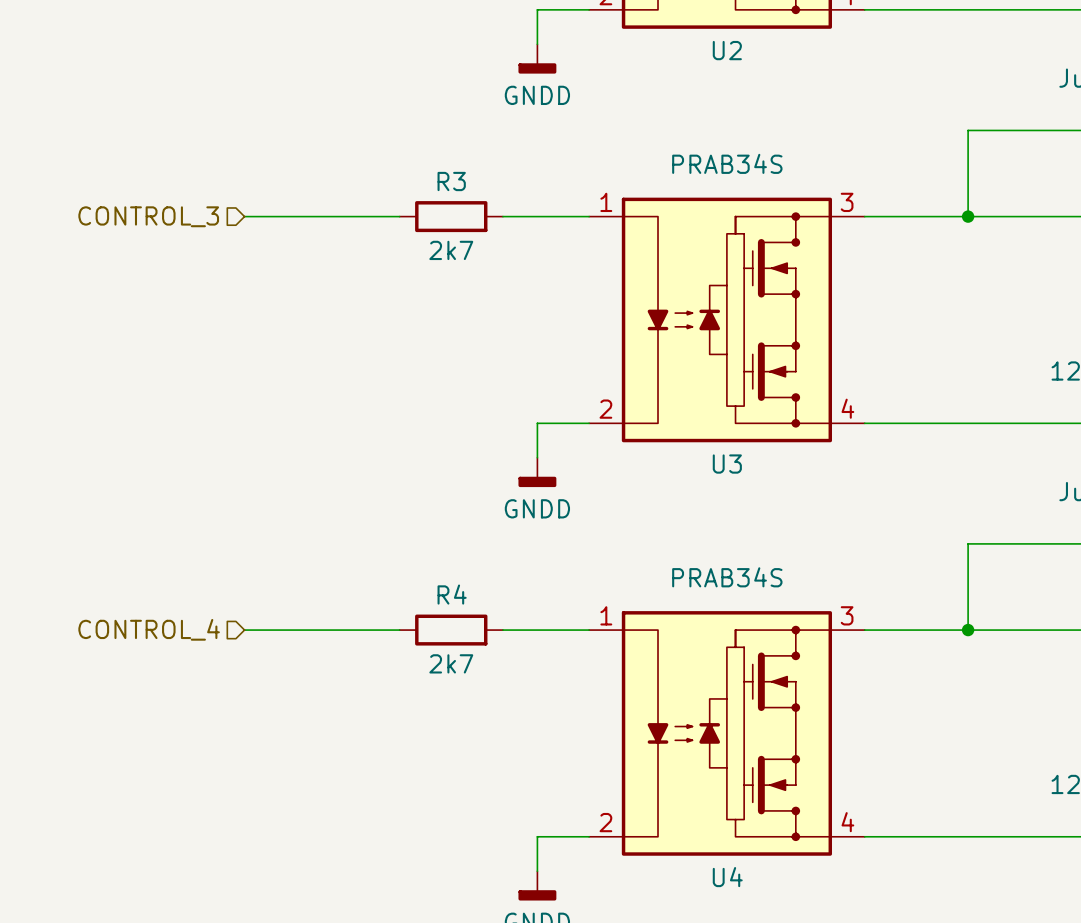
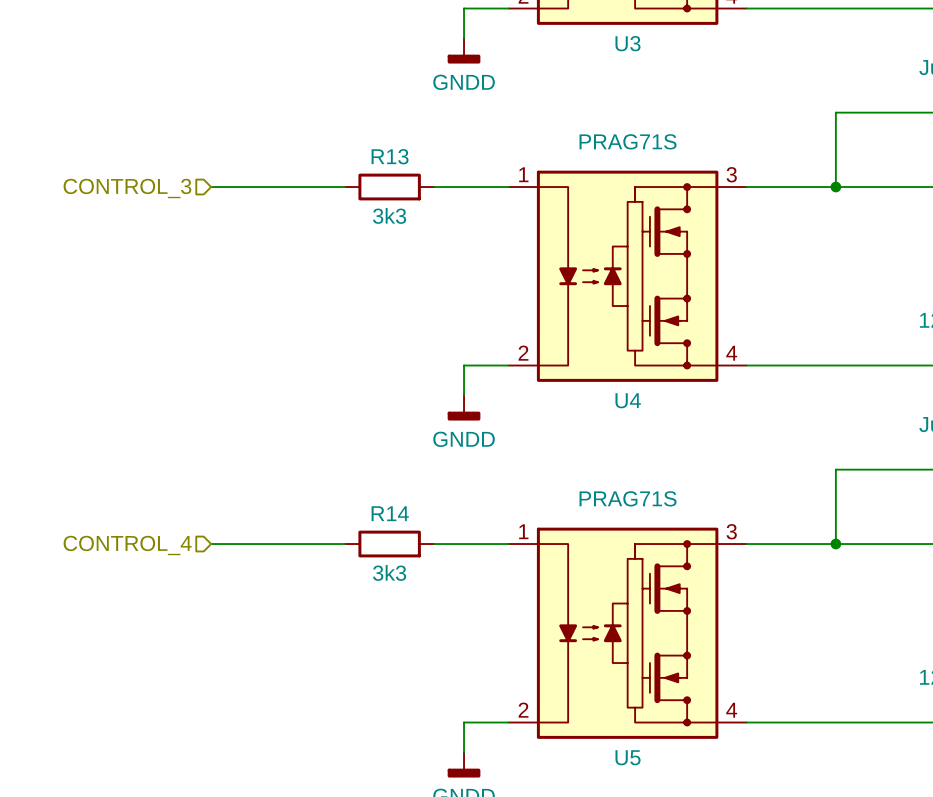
U2 name: U2 (727, 50) -> U3 (628, 43)
U3 value: PRAB34S (727, 163) -> PRAG71S (628, 141)
R3 name: R3 (451, 181) -> R13 (390, 156)
R3 value: 2k7 (451, 250) -> 3k3 (389, 215)
U3 name: U3 (727, 464) -> U4 (628, 400)
U4 value: PRAB34S (727, 577) -> PRAG71S (628, 498)
R4 name: R4 (452, 594) -> R14 (390, 513)
R4 value: 2k7 (451, 663) -> 3k3 (389, 572)
U4 name: U4 (727, 877) -> U5 (628, 757)

